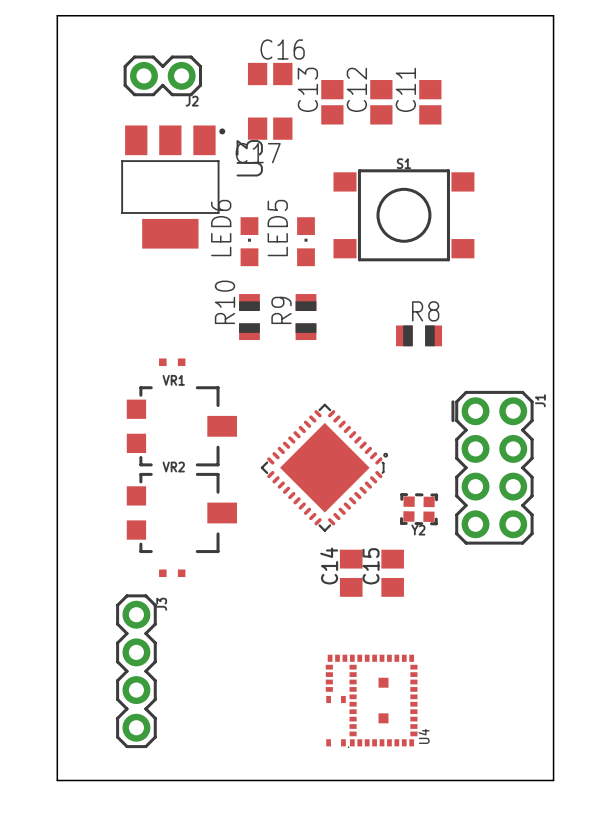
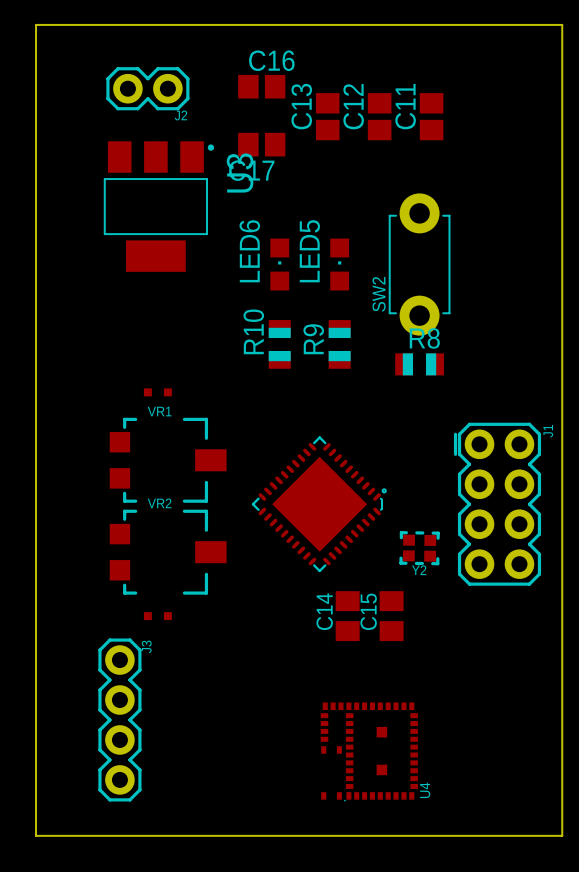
S1: (403, 215) -> none
LED6 position: (249, 241) -> (279, 264)
LED5 position: (305, 241) -> (339, 264)
SW2: none -> (419, 264)
R10 position: (249, 317) -> (279, 344)
R9 position: (305, 317) -> (339, 344)

